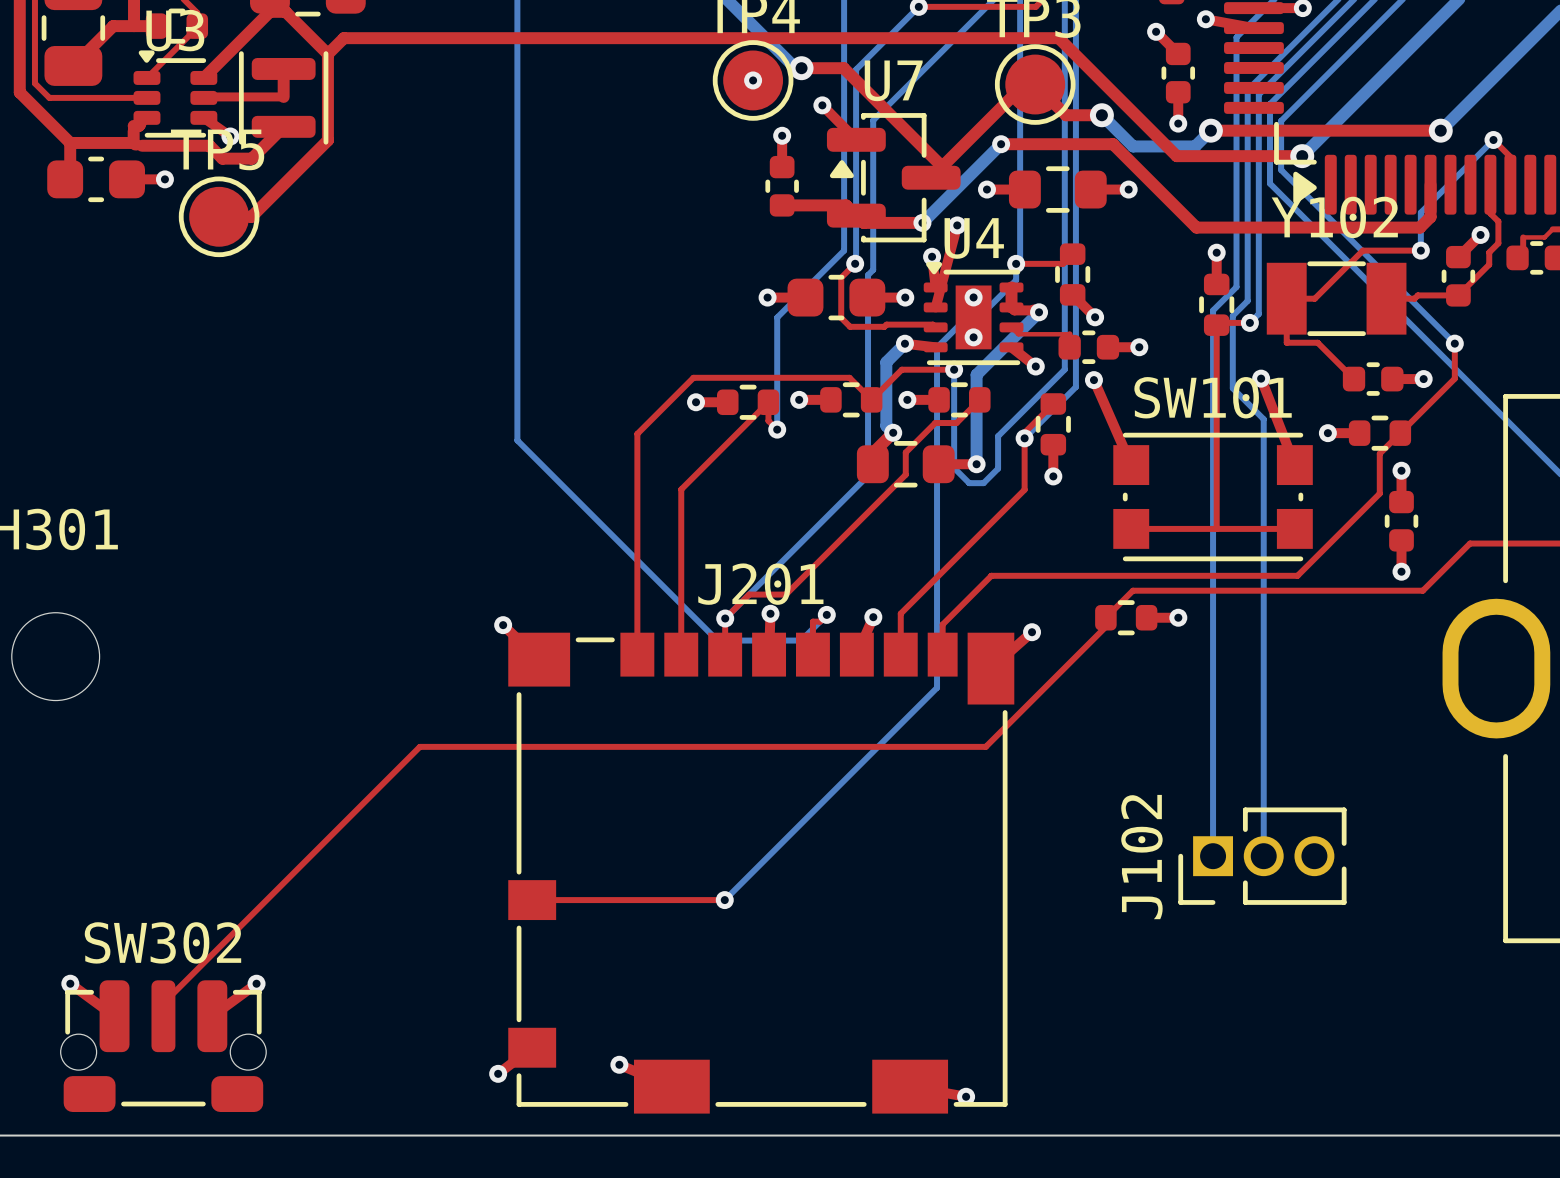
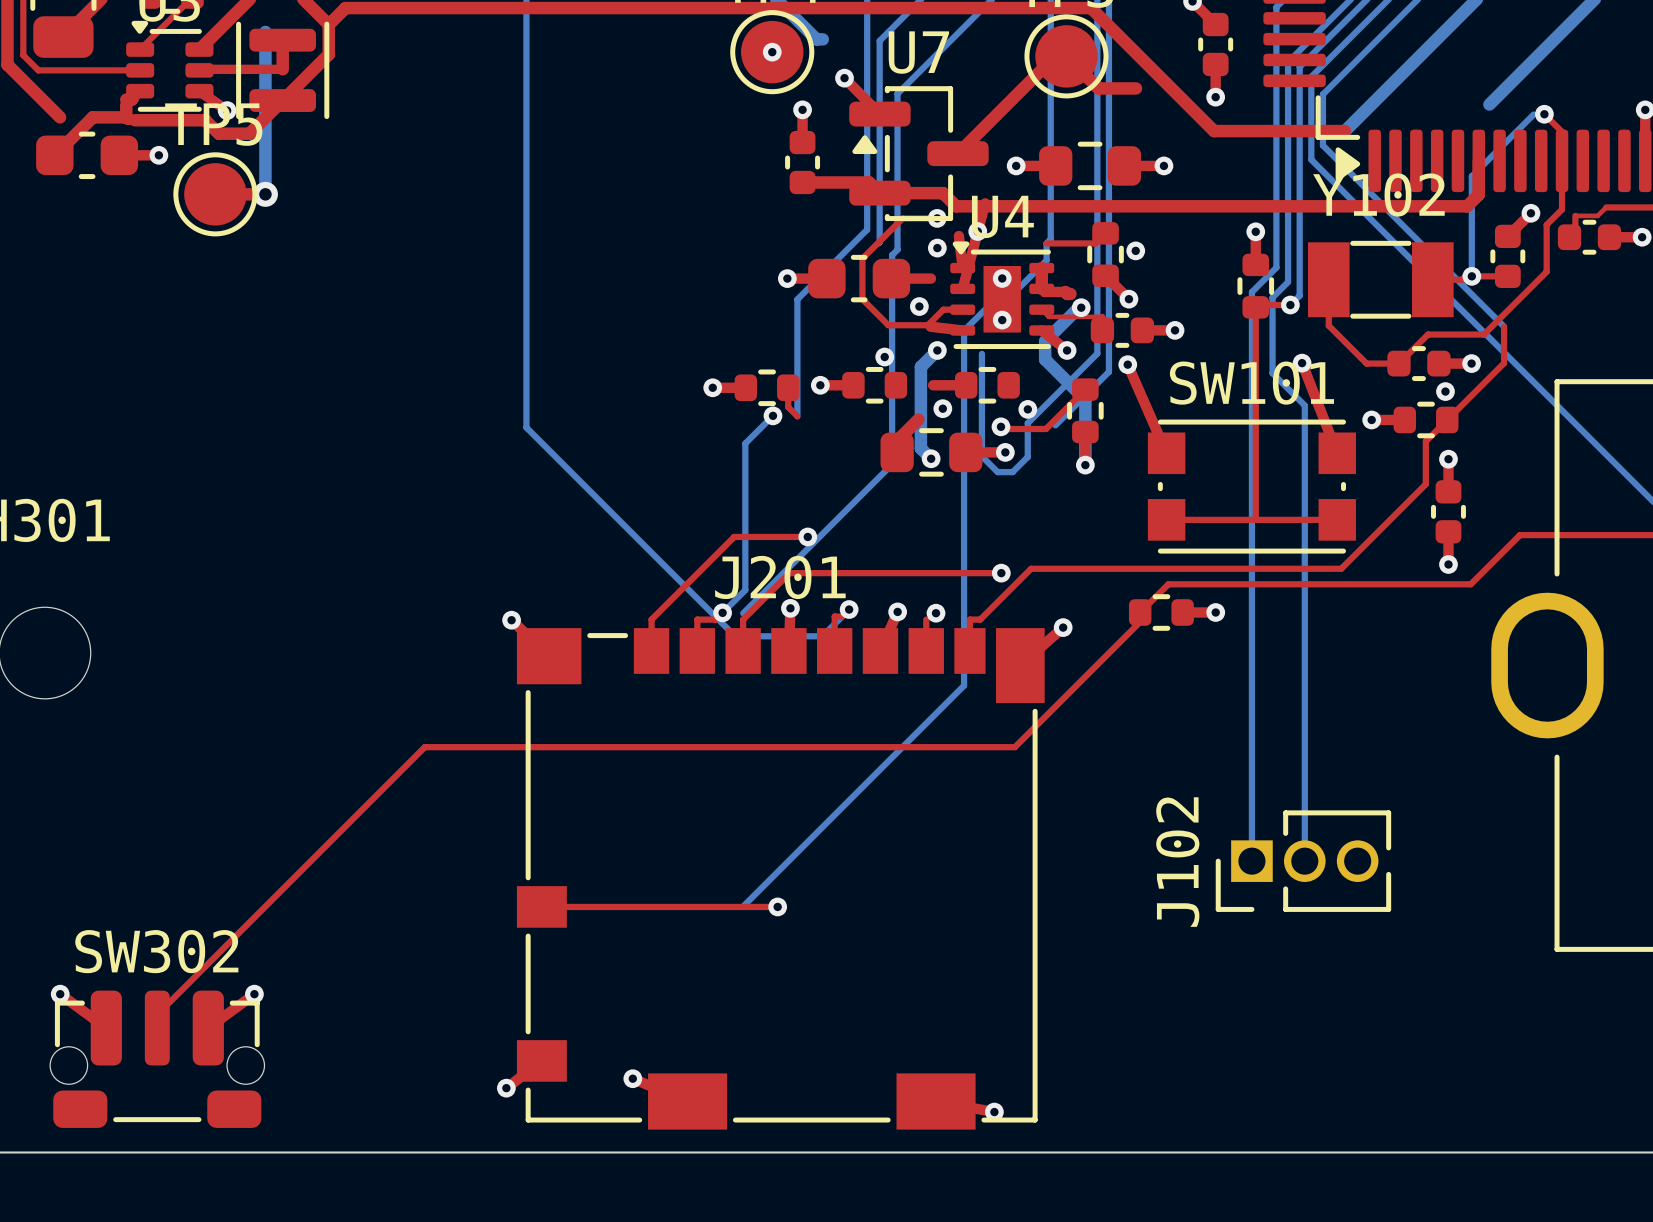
bottom track: none -> (265, 31) (265, 194)
top track: (801, 68) (843, 68) (942, 166) -> none
via: (801, 68) -> none
top track: (327, 82) (327, 140) (251, 216) -> (328, 54) (282, 100)
bottom track: (1101, 115) (1133, 146) (1195, 146) (1210, 130) -> none
via: (1101, 115) -> none
top track: (1210, 130) (1440, 130) -> none
via: (1210, 130) -> none
via: (1440, 130) -> none
bottom track: none -> (1533, 114) (1471, 176) (1471, 276)
bottom track: (1493, 140) (1420, 212) (1420, 250) -> none
top track: (101, 142) (70, 142) (70, 174) -> (92, 117) (60, 150)
top track: (1001, 144) (1113, 144) (1196, 227) (1420, 227) -> (879, 193) (942, 193) (956, 206) (1467, 205)
bottom track: (1001, 144) (922, 222) -> none
via: (1001, 144) -> none
via: (1302, 156) -> none
top track: (1490, 184) (1490, 213) (1498, 221) (1498, 243) -> (1562, 160) (1562, 209) (1549, 221)
top track: (856, 215) (863, 222) (922, 222) -> none
via: none -> (265, 194)
via position: (922, 222) -> (937, 218)
via: (957, 225) -> none
top track: (1495, 246) (1489, 252) (1489, 264) (1458, 295) -> (1546, 224) (1546, 271) (1483, 334) (1427, 334) (1398, 363) (1366, 363) (1328, 325)
top track: (1420, 250) (1362, 250) (1314, 298) (1286, 298) -> none
via: (1420, 250) -> none
via: none -> (977, 231)
via: (932, 256) -> none
top track: (855, 263) (841, 277) (841, 317) (850, 326) (932, 324) (935, 327) -> (937, 218) (902, 218) (862, 258) (862, 299) (888, 325) (927, 325) (943, 309) (962, 309)
via: (855, 263) -> none
via: (1016, 263) -> none
via: none -> (937, 248)
via: none -> (1135, 250)
via: none -> (1471, 276)
via: (905, 297) -> none
bottom track: (1039, 312) (976, 374) (976, 464) -> none
via position: (1039, 312) -> (1081, 307)
via: none -> (919, 306)
bottom track: none -> (1081, 307) (1078, 307) (1045, 341) (1045, 359) (1085, 399) (1085, 465)
top track: (1286, 342) (1317, 342) (1354, 379) -> none
bottom track: (904, 343) (886, 362) (886, 425) (893, 432) -> none
via: (904, 343) -> none
via: (1454, 343) -> none
bottom track: none -> (937, 350) (920, 366) (920, 448) (931, 458)
via: none -> (937, 350)
top track: (954, 369) (901, 369) (871, 399) (849, 377) (693, 377) (637, 433) (637, 624) -> (807, 536) (734, 536) (651, 619)
via: (954, 369) -> none
via: none -> (884, 357)
via: (907, 399) -> none
top track: (979, 399) (956, 423) (935, 423) (905, 452) (905, 474) (785, 594) (749, 594) (725, 618) (725, 624) -> (1001, 573) (789, 573) (743, 619)
top track: (768, 402) (681, 489) (681, 624) -> (722, 612) (715, 619) (697, 619)
via: none -> (1445, 391)
via: none -> (942, 408)
via: none -> (1027, 409)
bottom track: none -> (772, 415) (745, 443) (745, 590) (722, 612)
via position: (777, 429) -> (772, 415)
via: (893, 432) -> none
top track: (1024, 432) (1024, 489) (900, 613) (900, 624) -> (1055, 419) (1045, 429) (1003, 429) (1000, 426)
via: (1024, 438) -> none
via: none -> (1000, 426)
via: none -> (931, 458)
top track: (1379, 493) (1297, 575) (991, 575) -> (1425, 483) (1341, 568) (1031, 568) (980, 619) (969, 619)
via: none -> (807, 536)
top track: (991, 575) (942, 624) -> none
via: none -> (1001, 573)
via position: (725, 618) -> (722, 612)
via: none -> (936, 613)
top track: none -> (742, 906) (777, 906)
via position: (724, 900) -> (777, 906)

